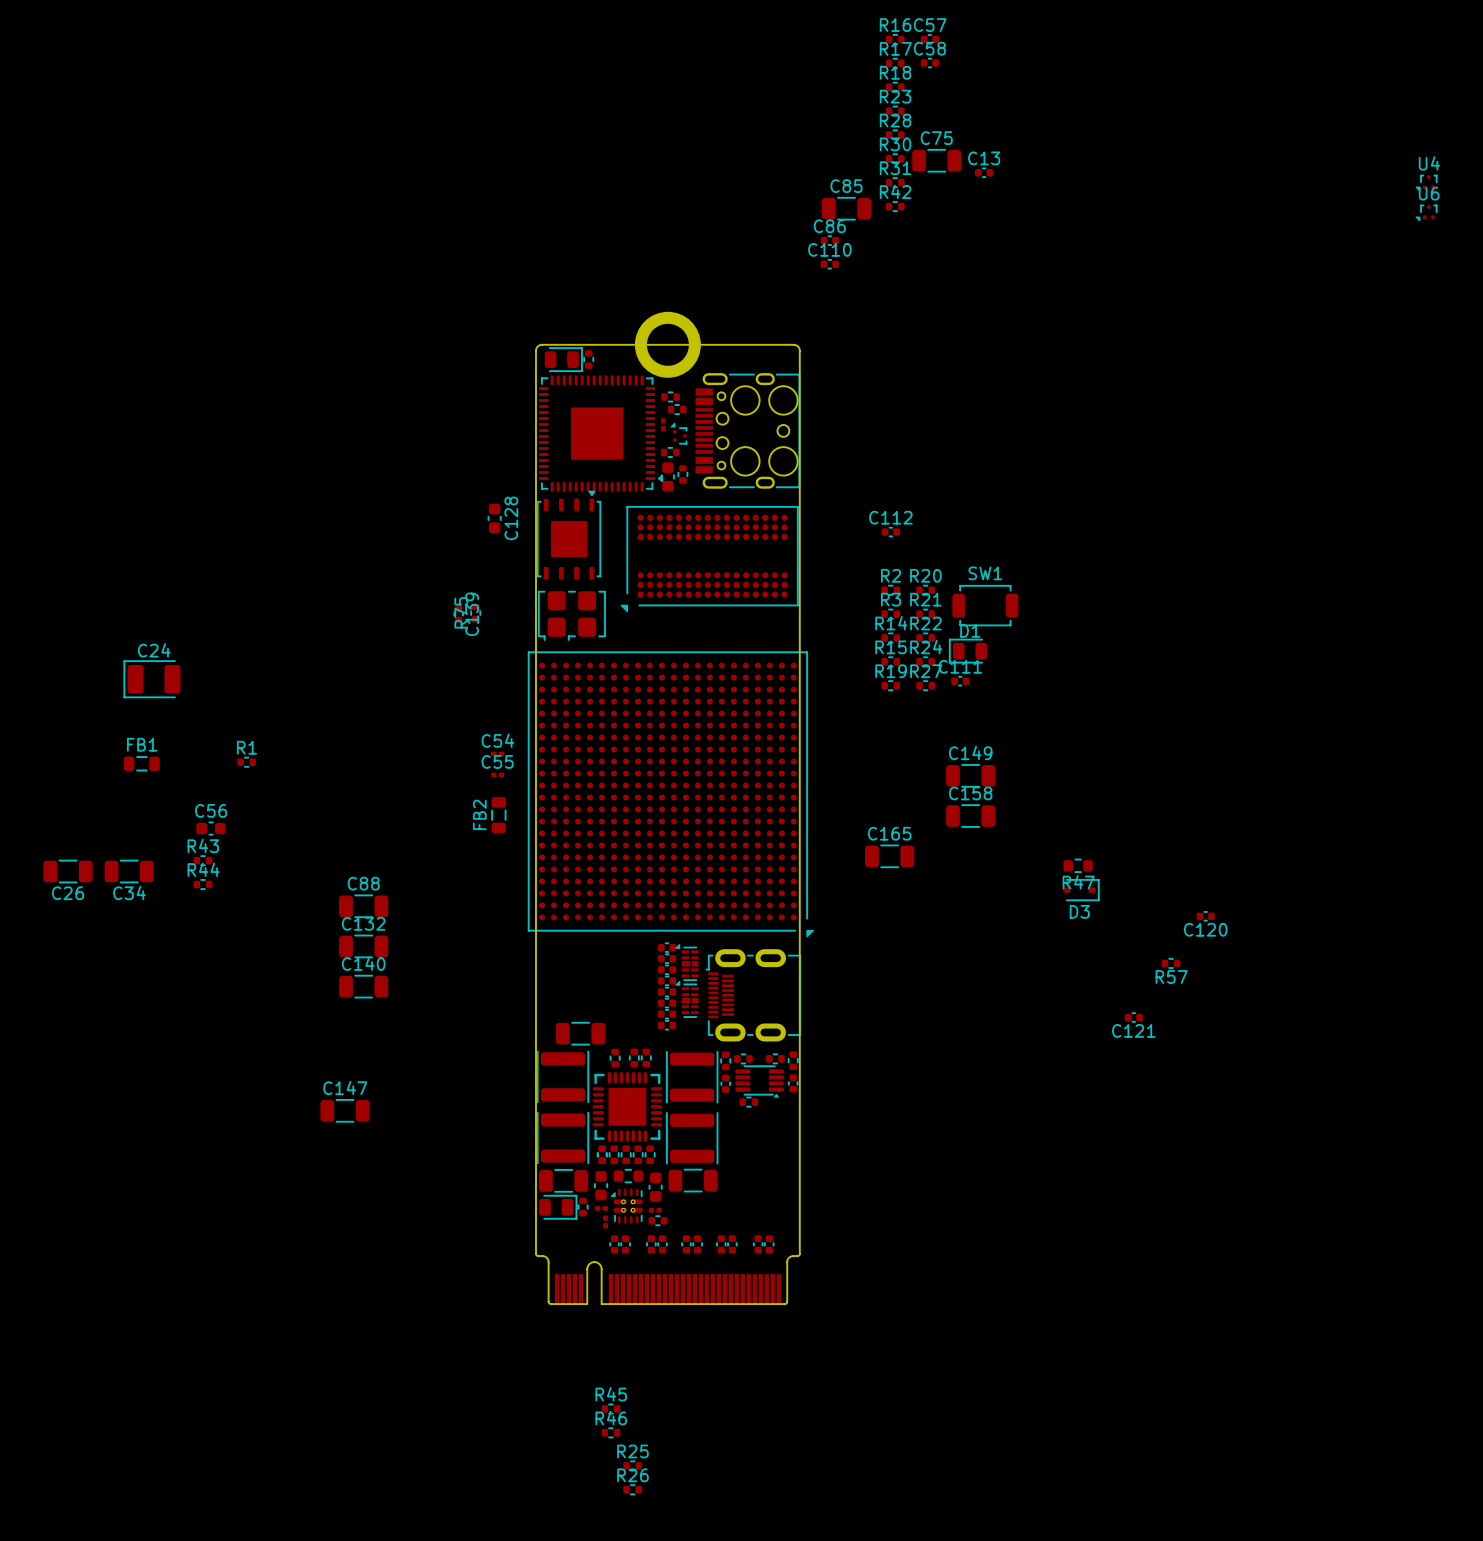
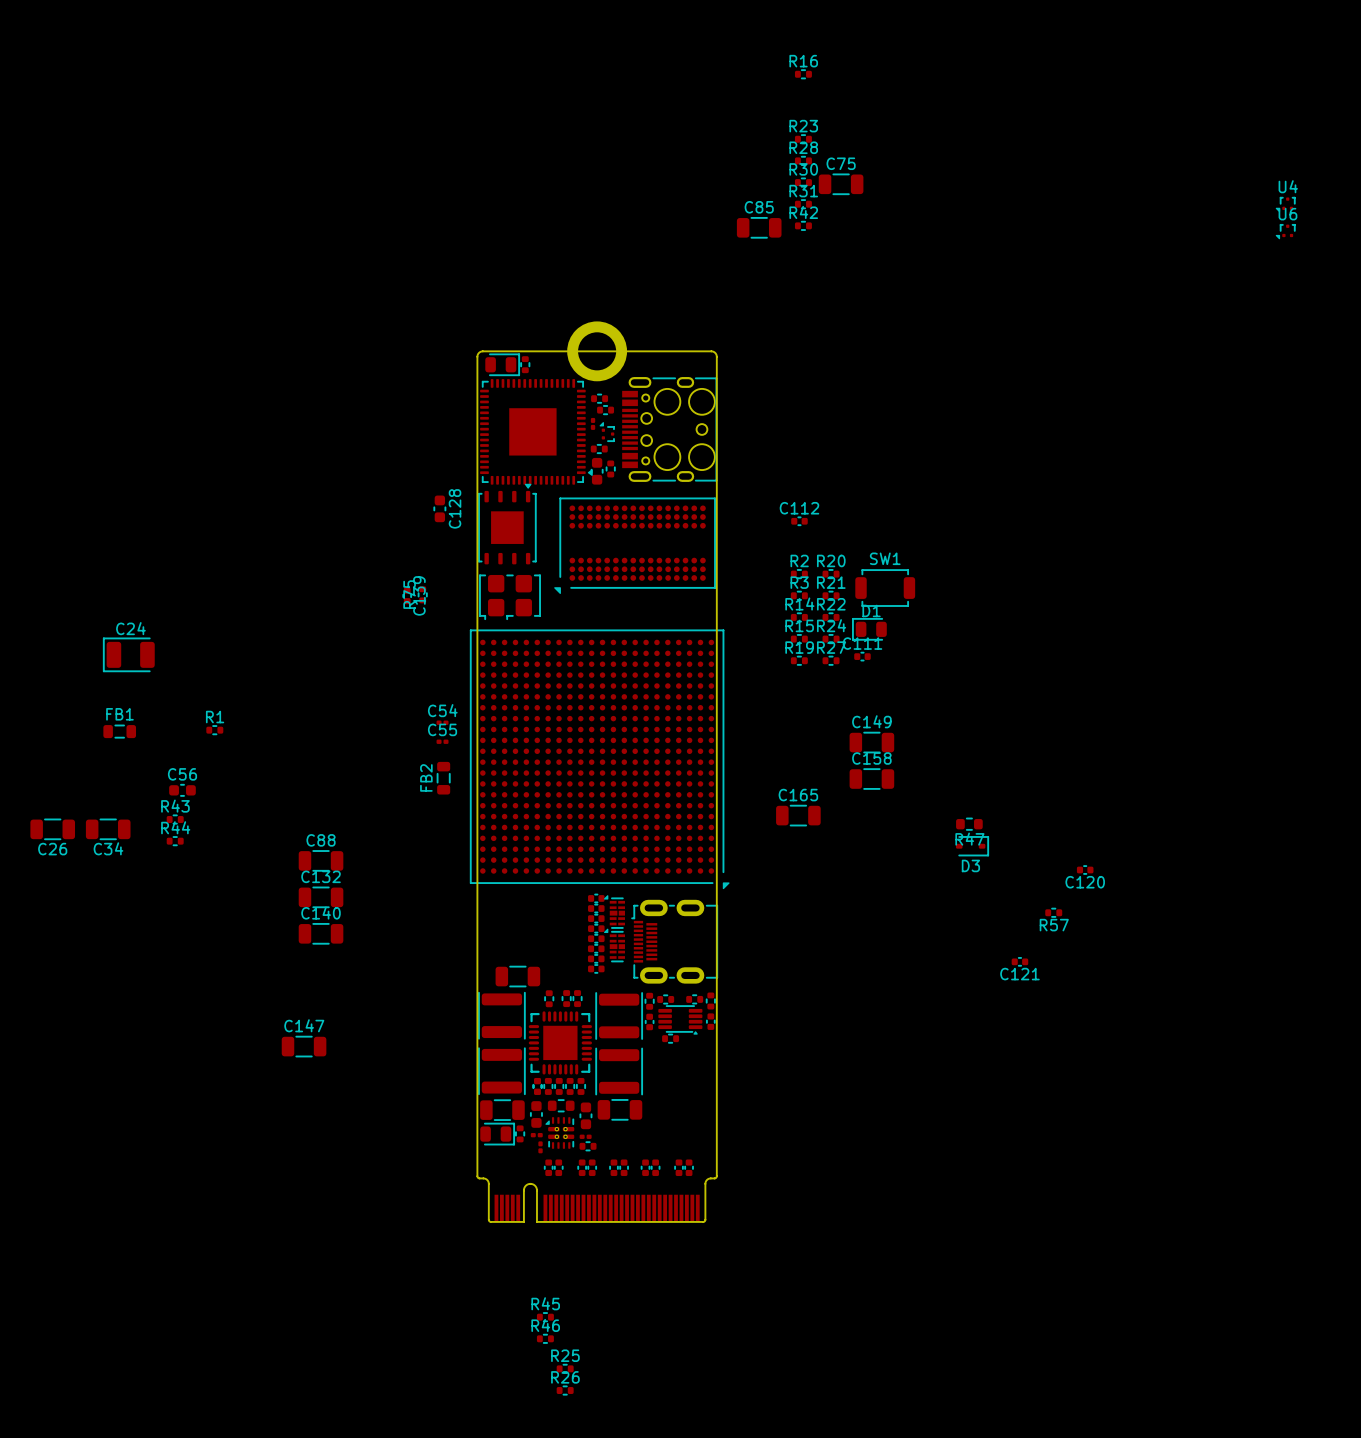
C57: (929, 39) -> none
R17: (895, 63) -> none
C58: (929, 63) -> none
R18: (895, 87) -> none
C13: (984, 172) -> none
C86: (829, 240) -> none
C110: (829, 264) -> none

